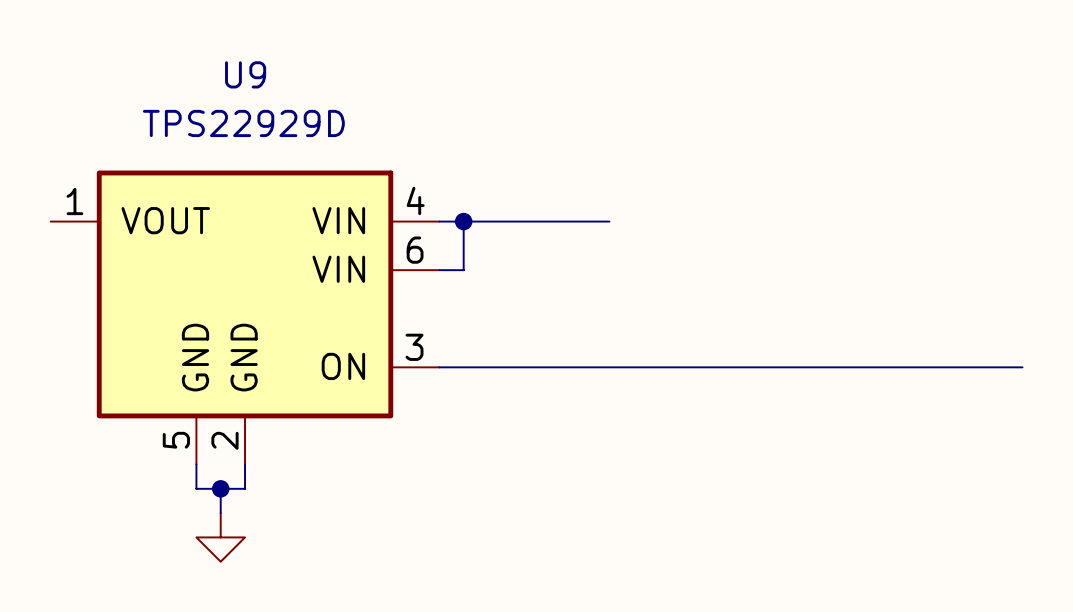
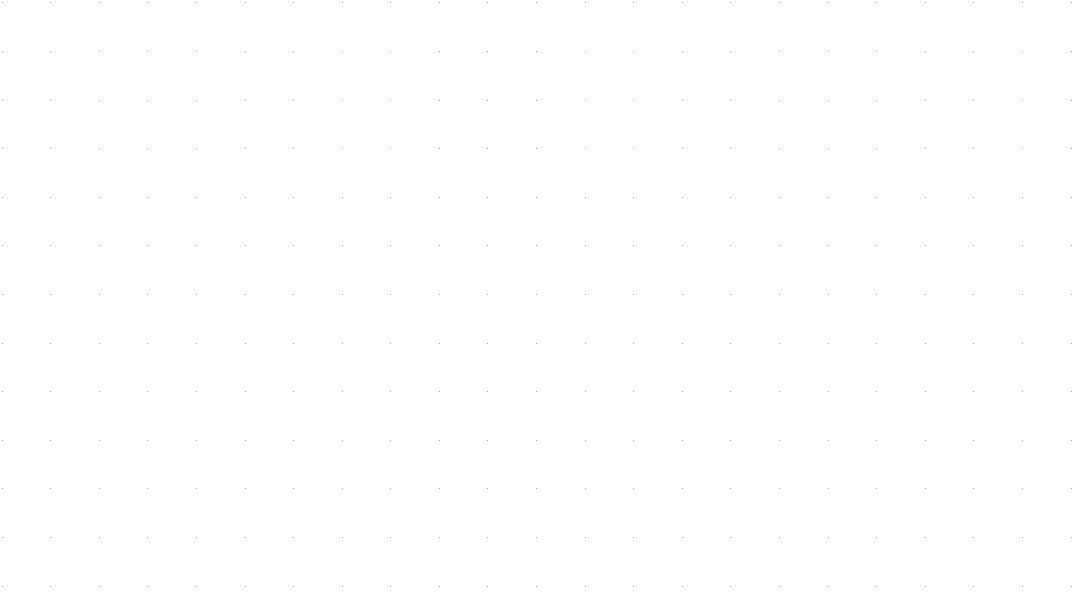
wire: (439, 221) (609, 221) -> none
wire: (463, 221) (463, 270) (439, 270) -> none
junction: (463, 221) -> none
U9: TPS22929D (245, 317) -> none
wire: (439, 367) (1022, 367) -> none
wire: (196, 464) (196, 488) (245, 488) (245, 464) -> none
wire: (220, 488) (220, 513) -> none
junction: (220, 488) -> none
power symbol: (220, 537) -> none

